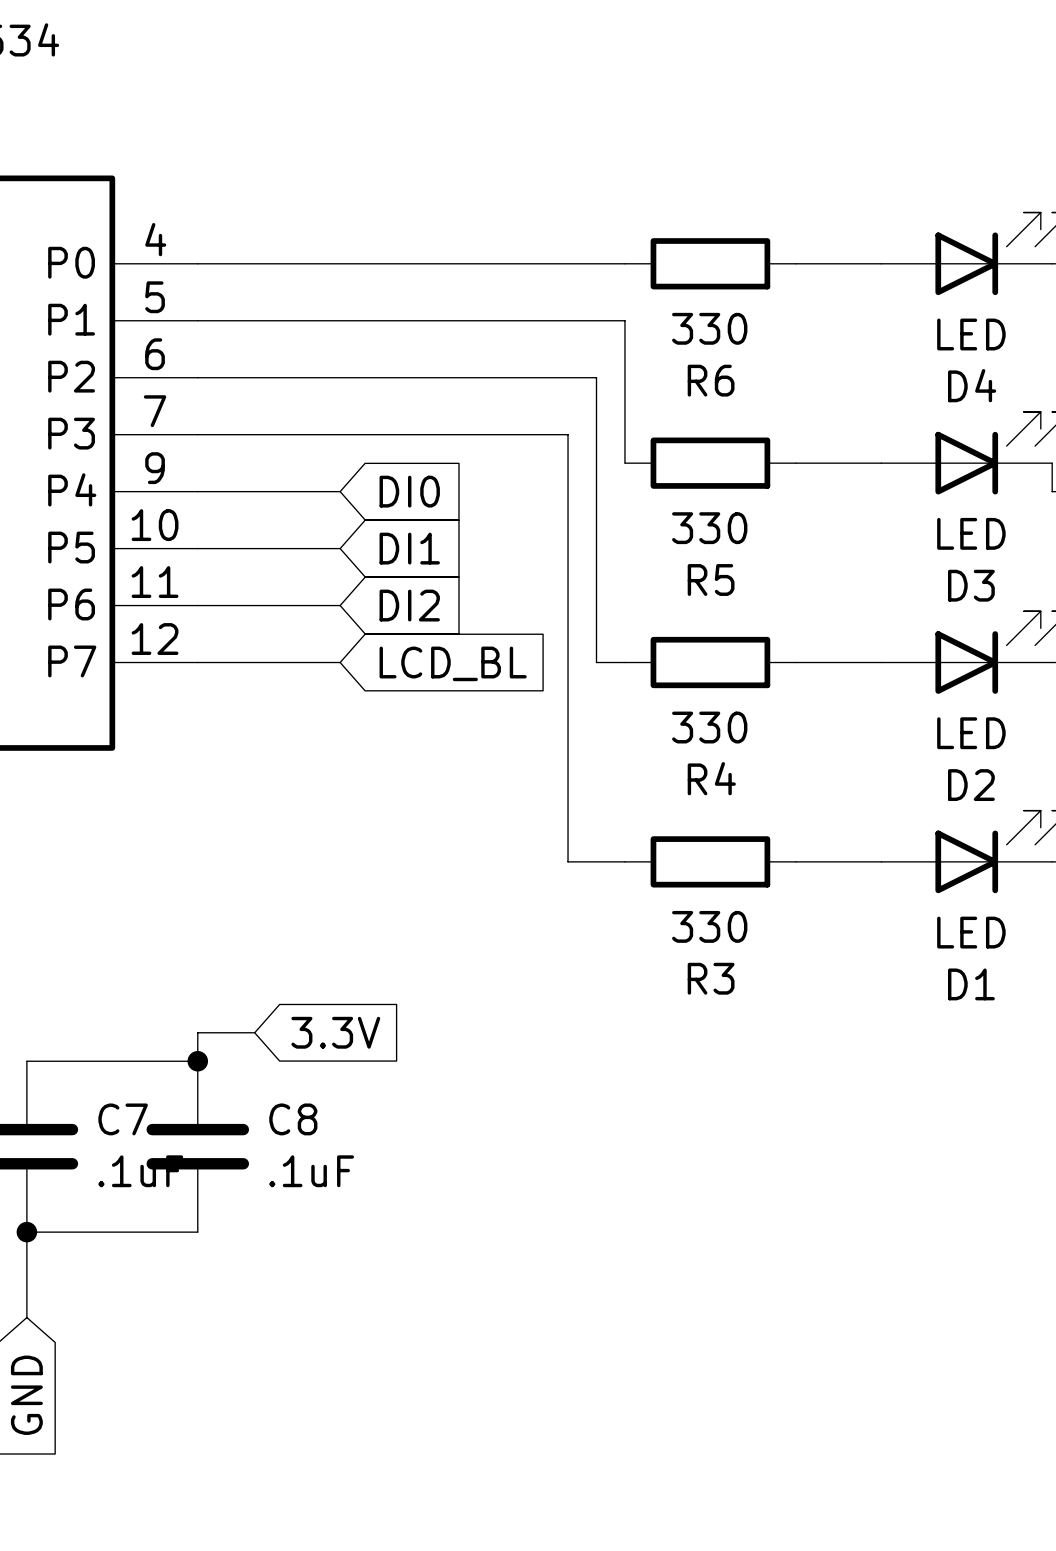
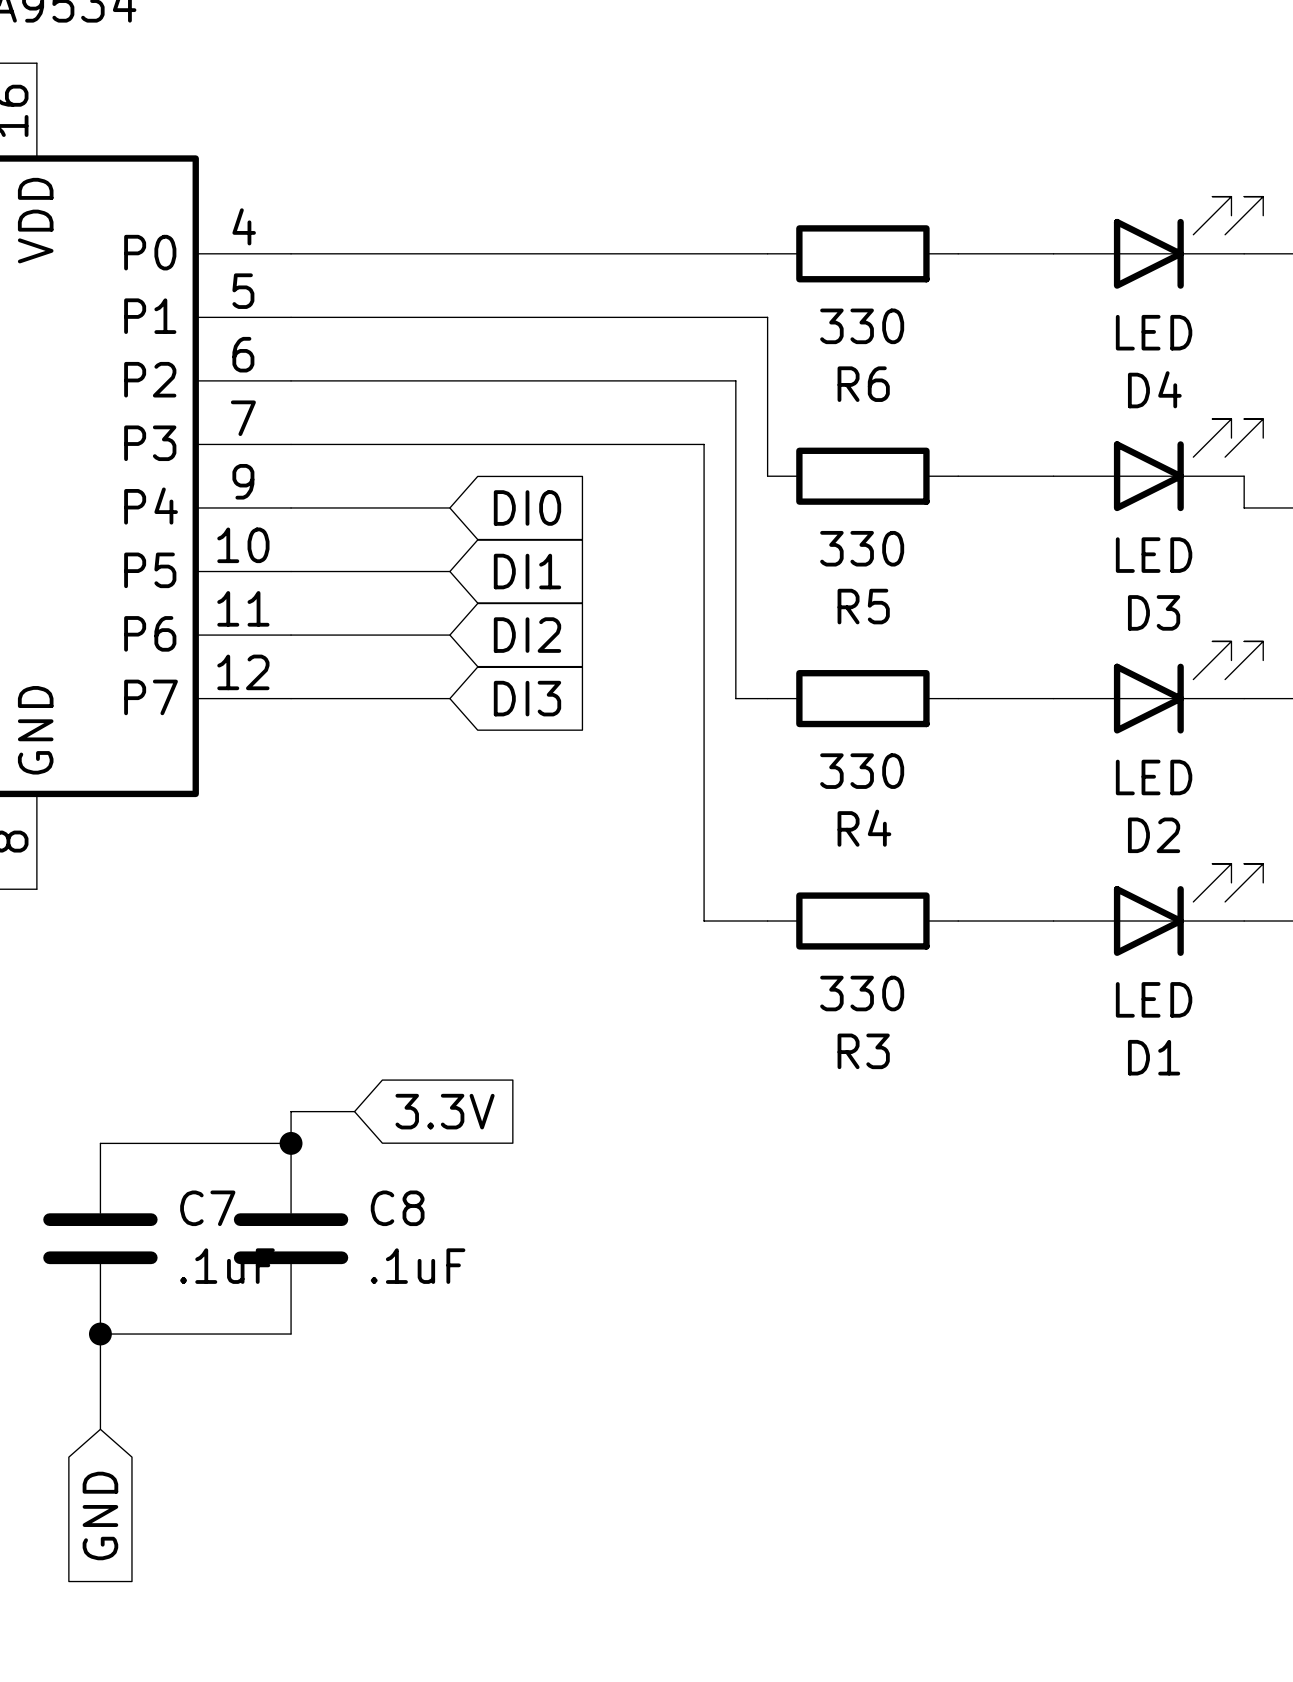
global label: LCD_BL (453, 663) -> DI3 (527, 698)

